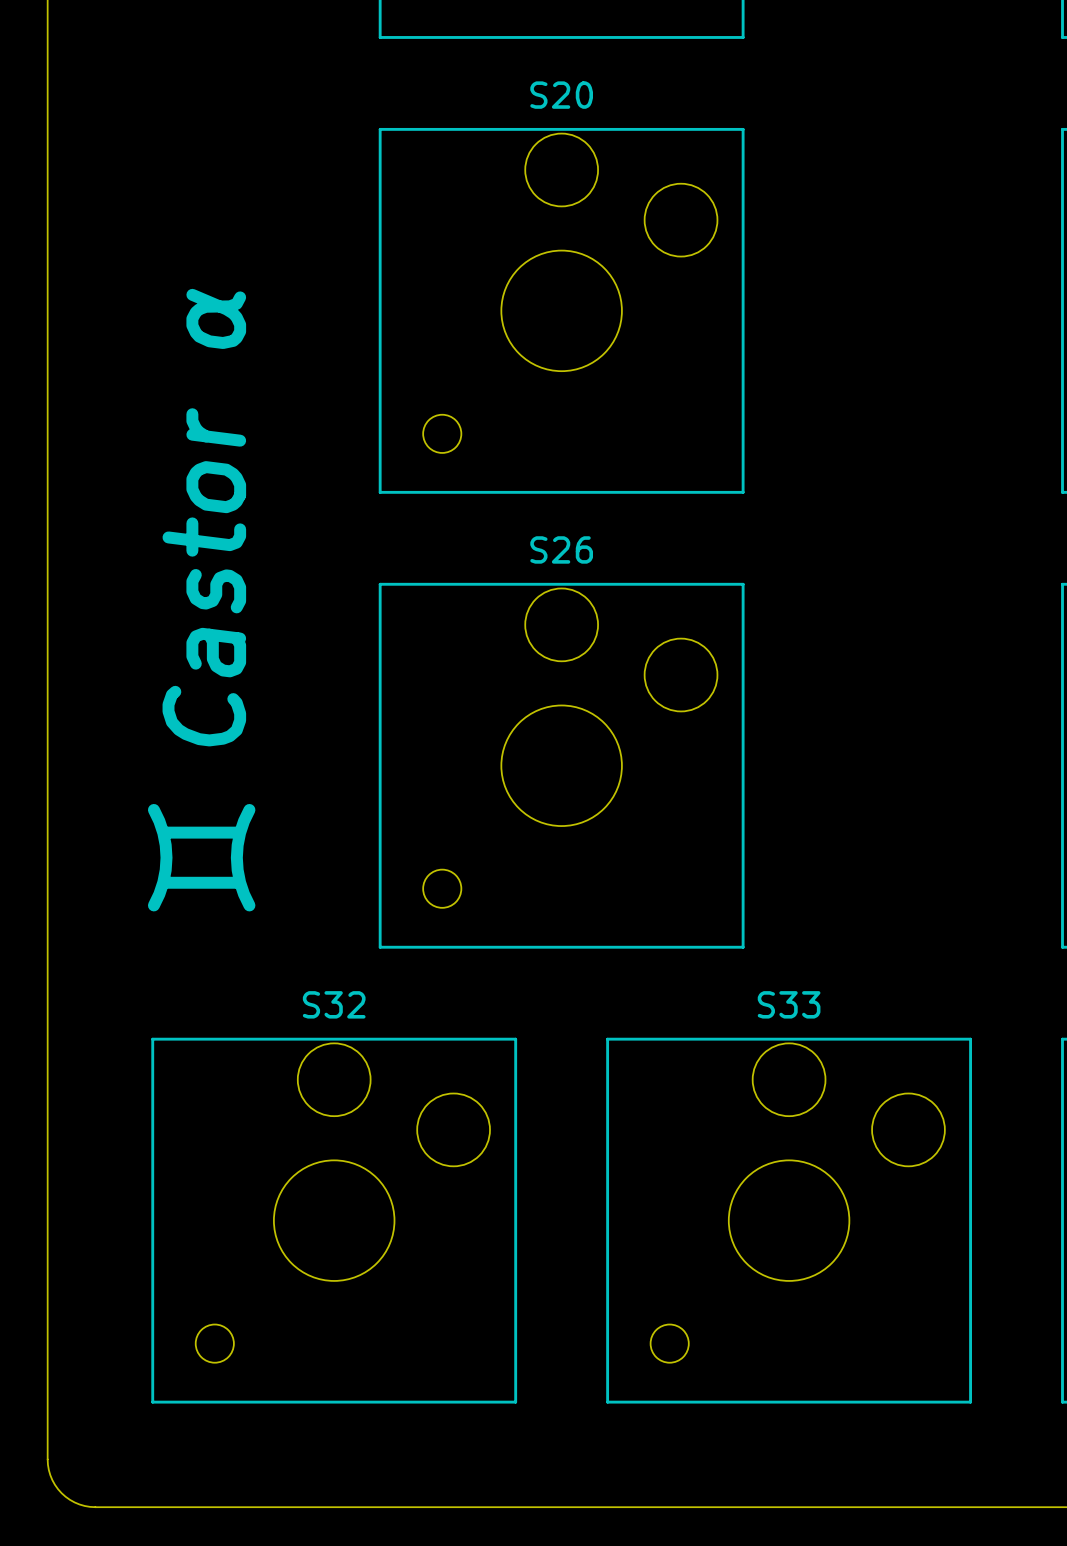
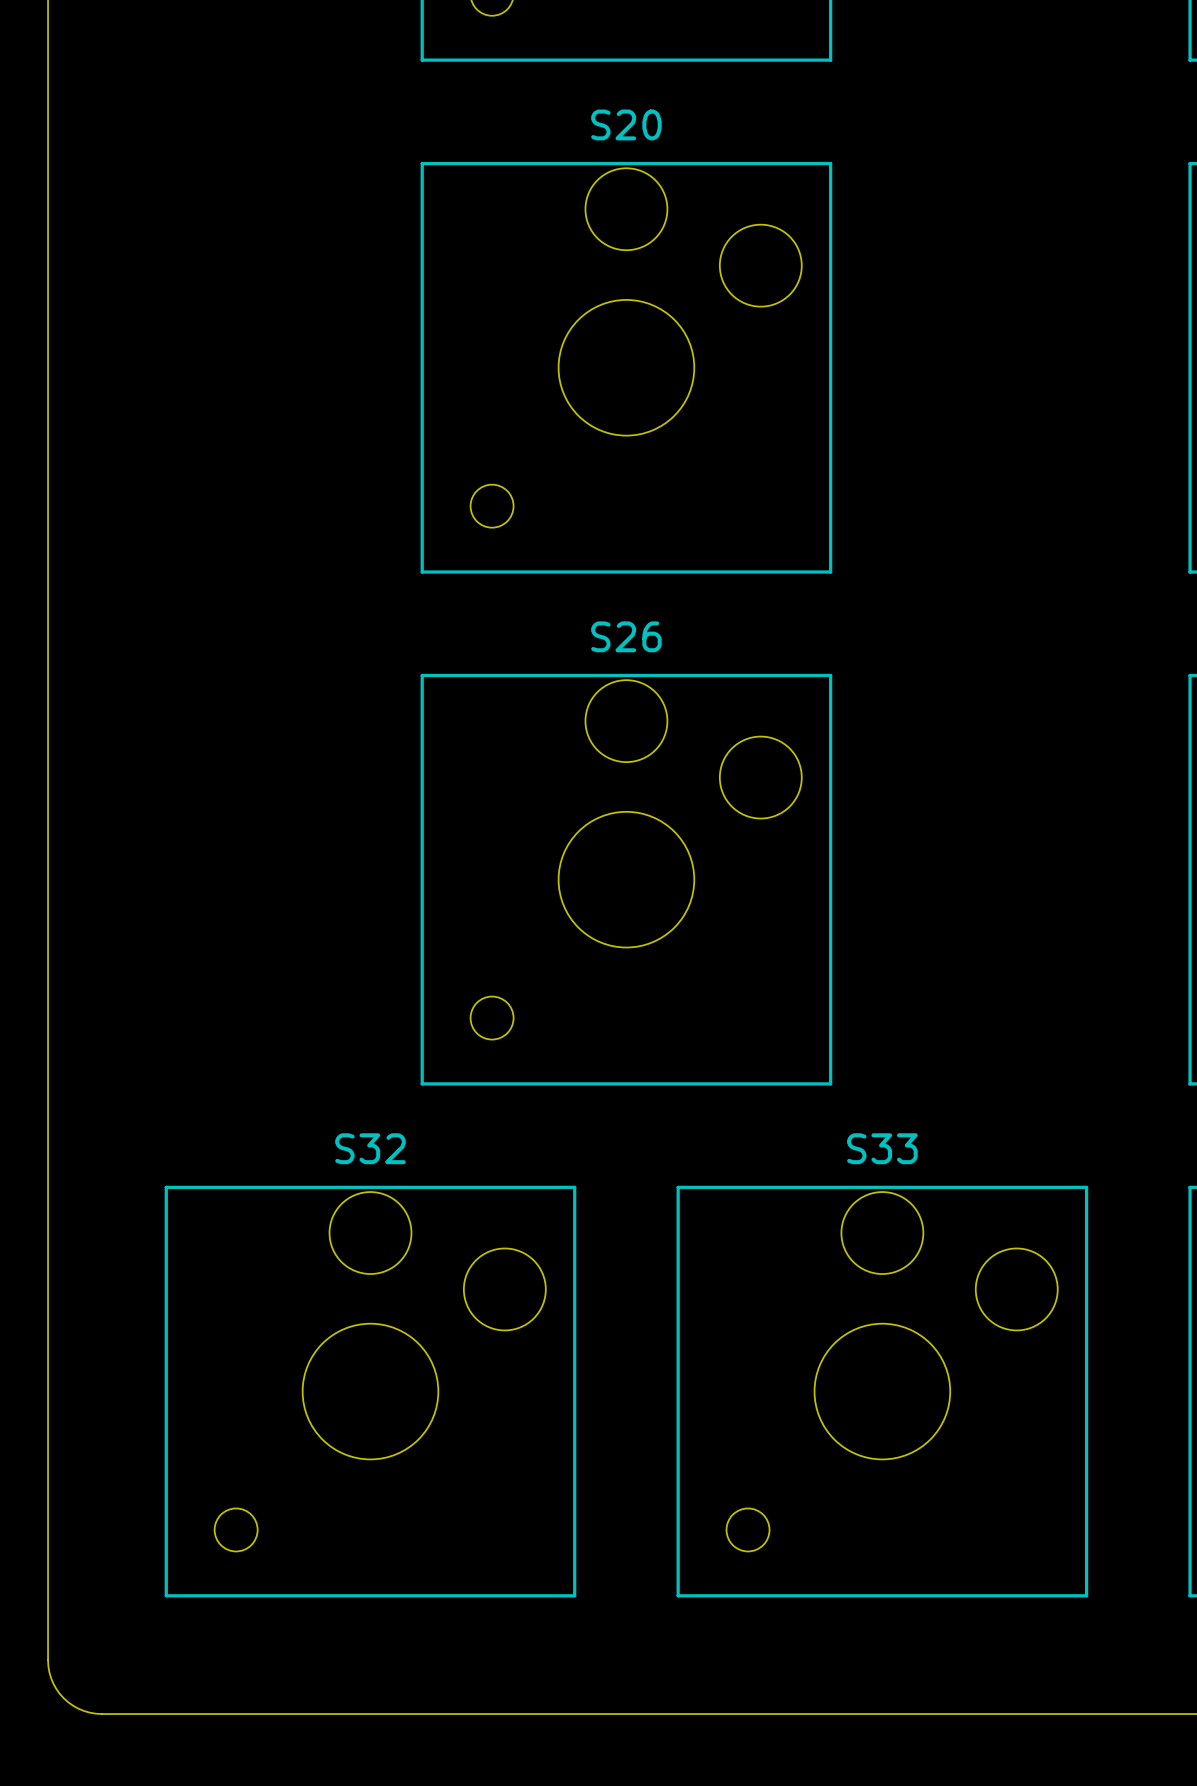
text: Castor α (204, 517) -> none
line: (153, 809) (163, 833) (166, 857) (163, 882) (153, 905) -> none
line: (249, 809) (240, 833) (236, 857) (240, 882) (249, 905) -> none
line: (165, 832) (237, 832) -> none
line: (165, 882) (237, 882) -> none

